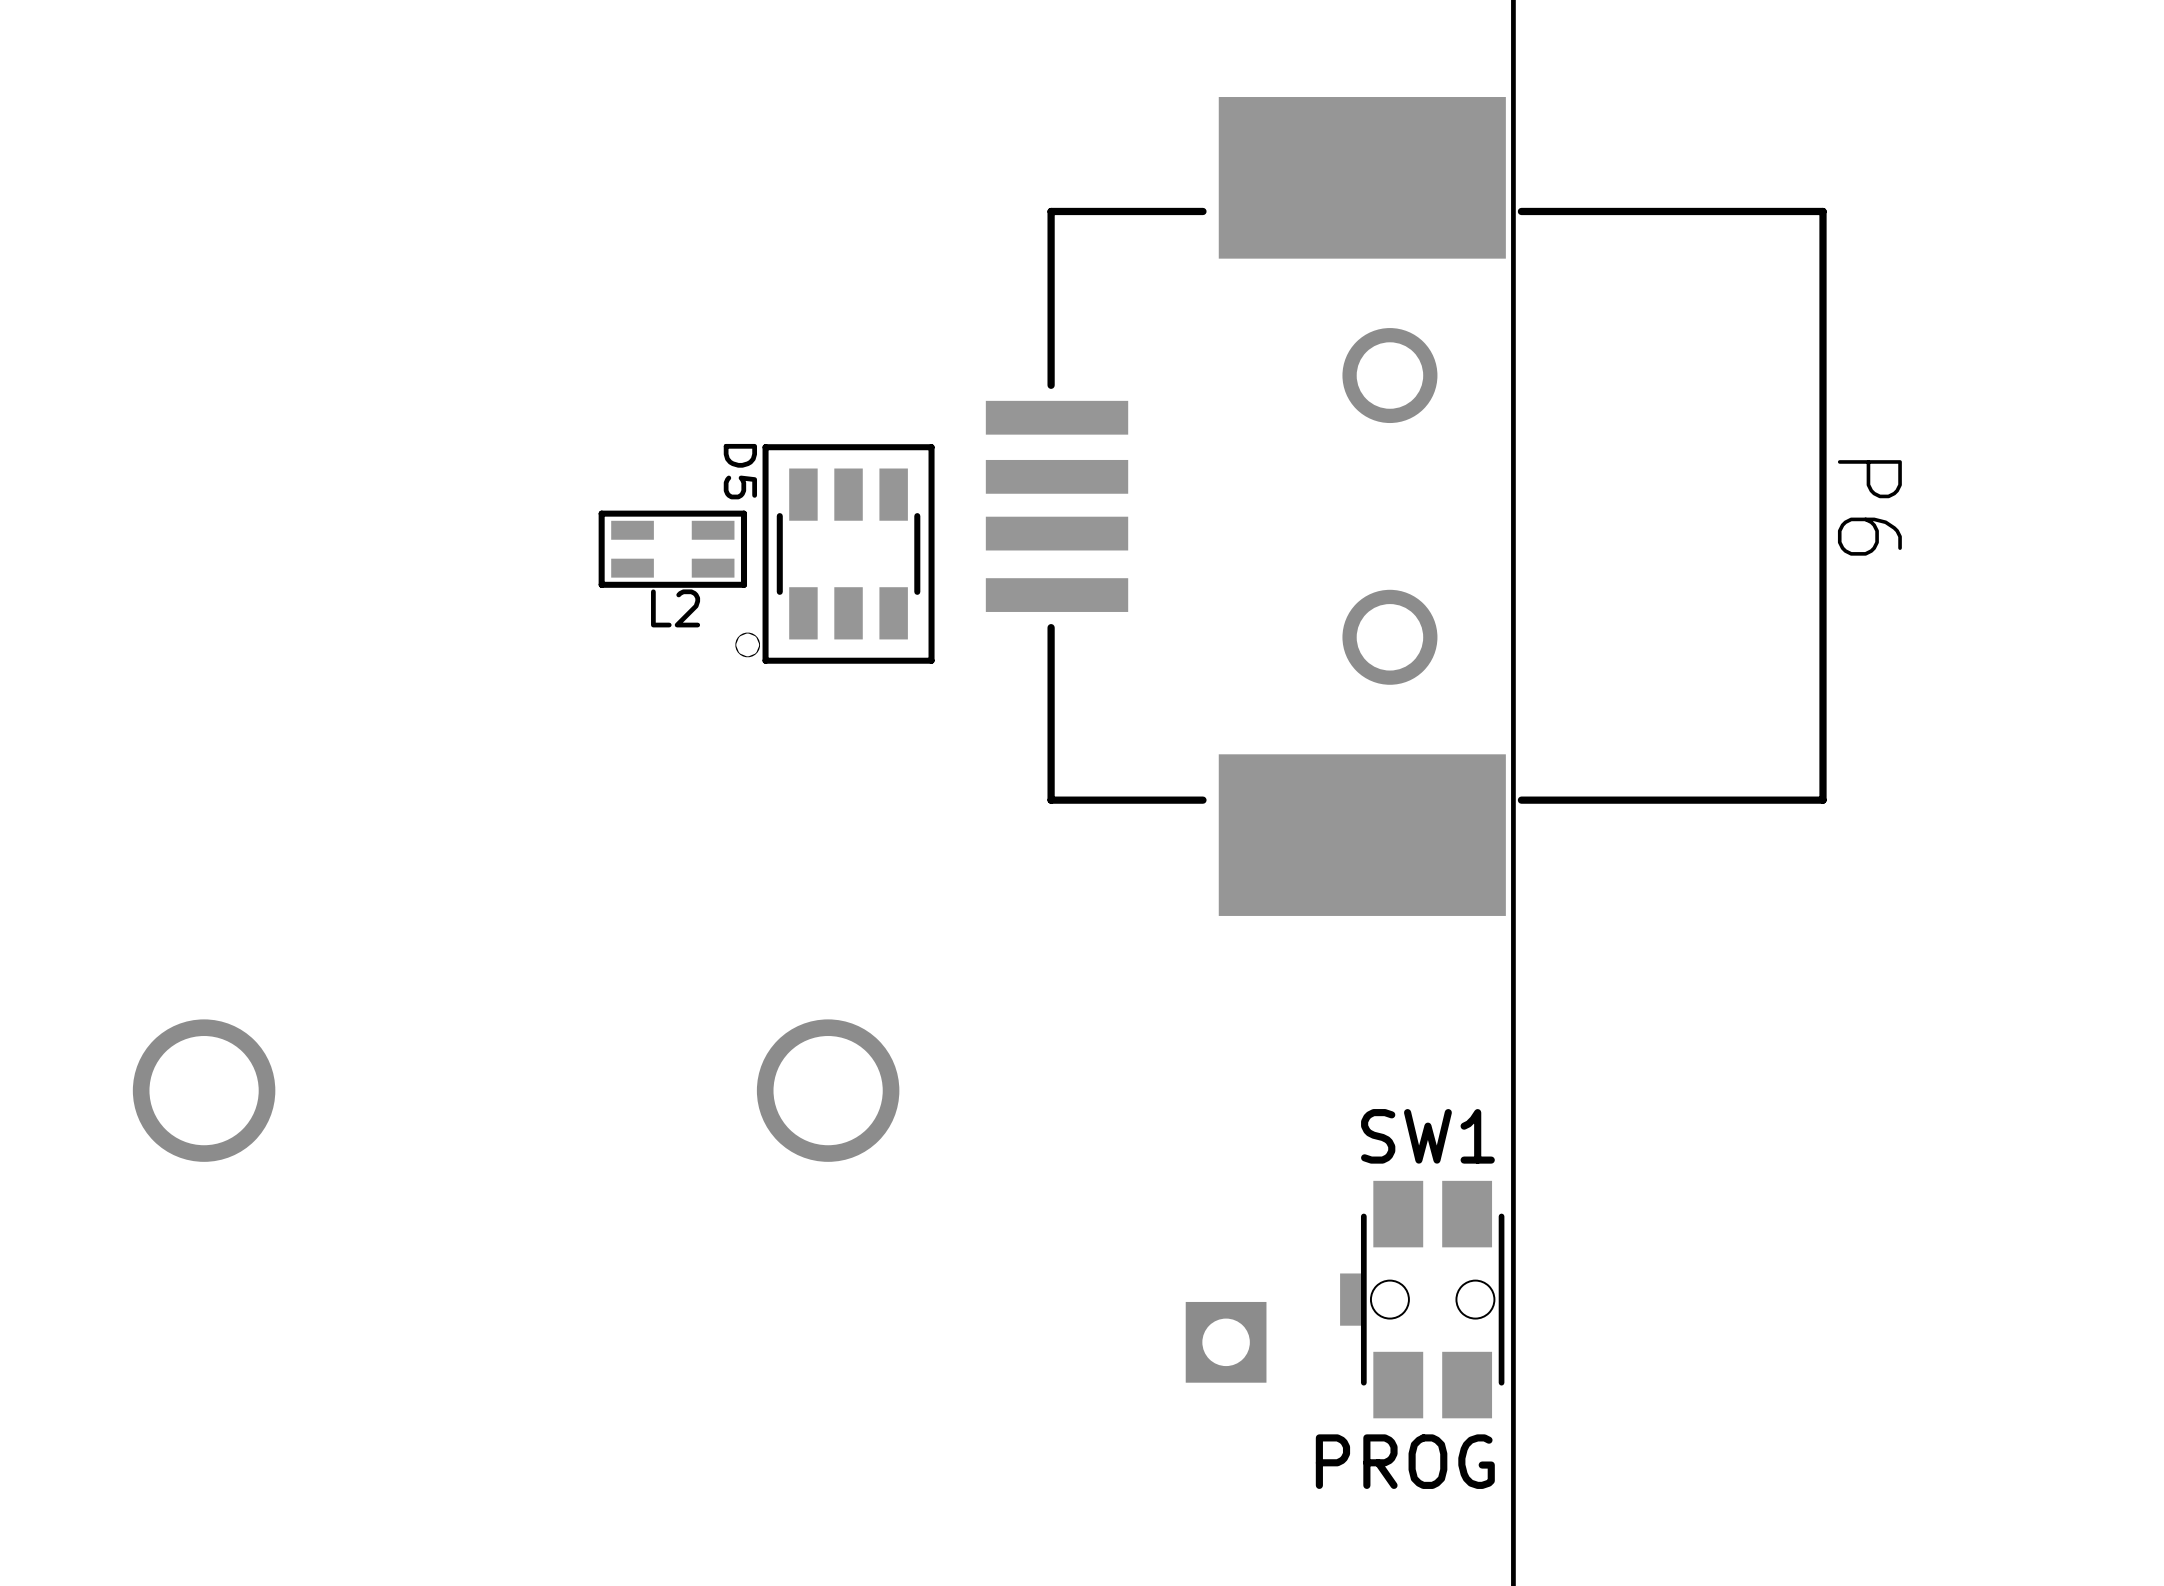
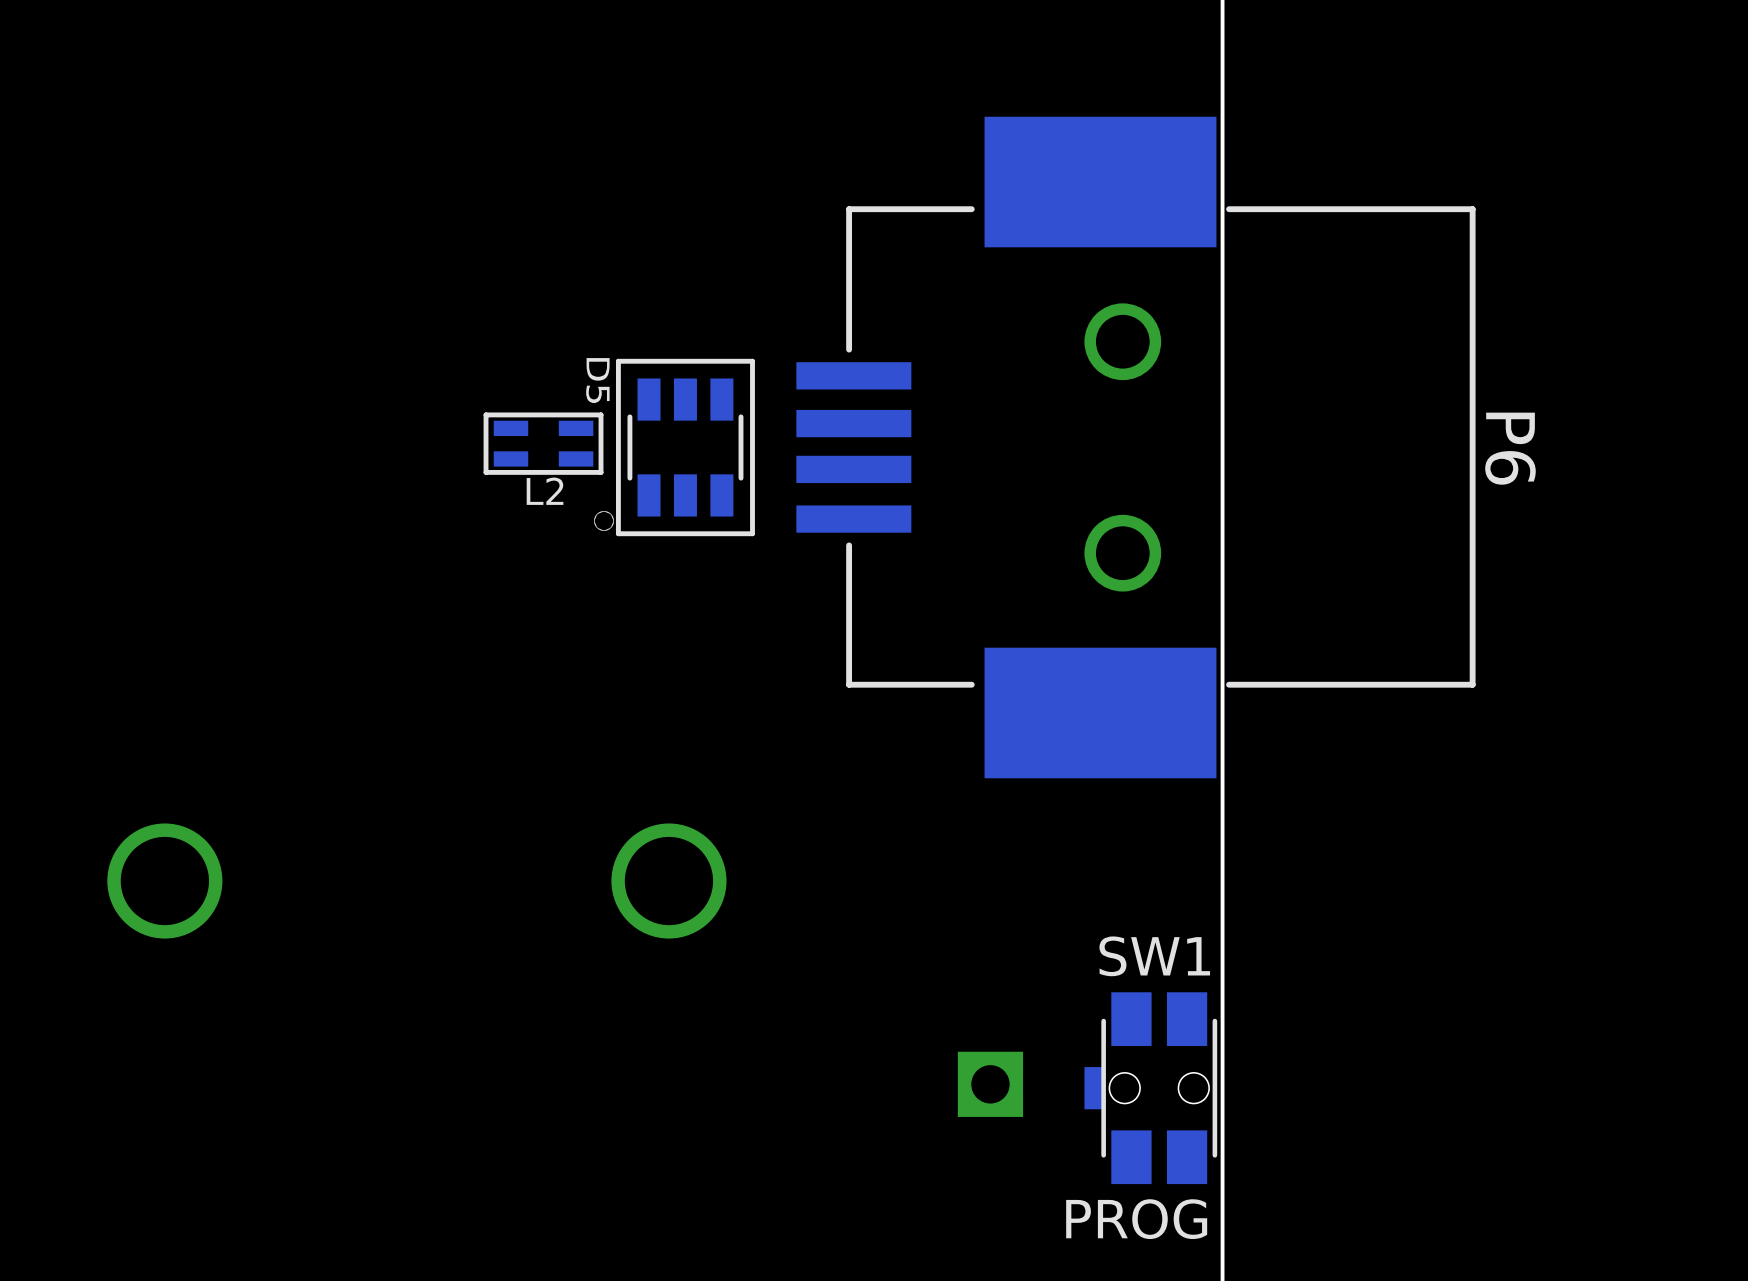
P6 position: (1406, 506) -> (1135, 447)
SW1 position: (1422, 1299) -> (1150, 1088)

